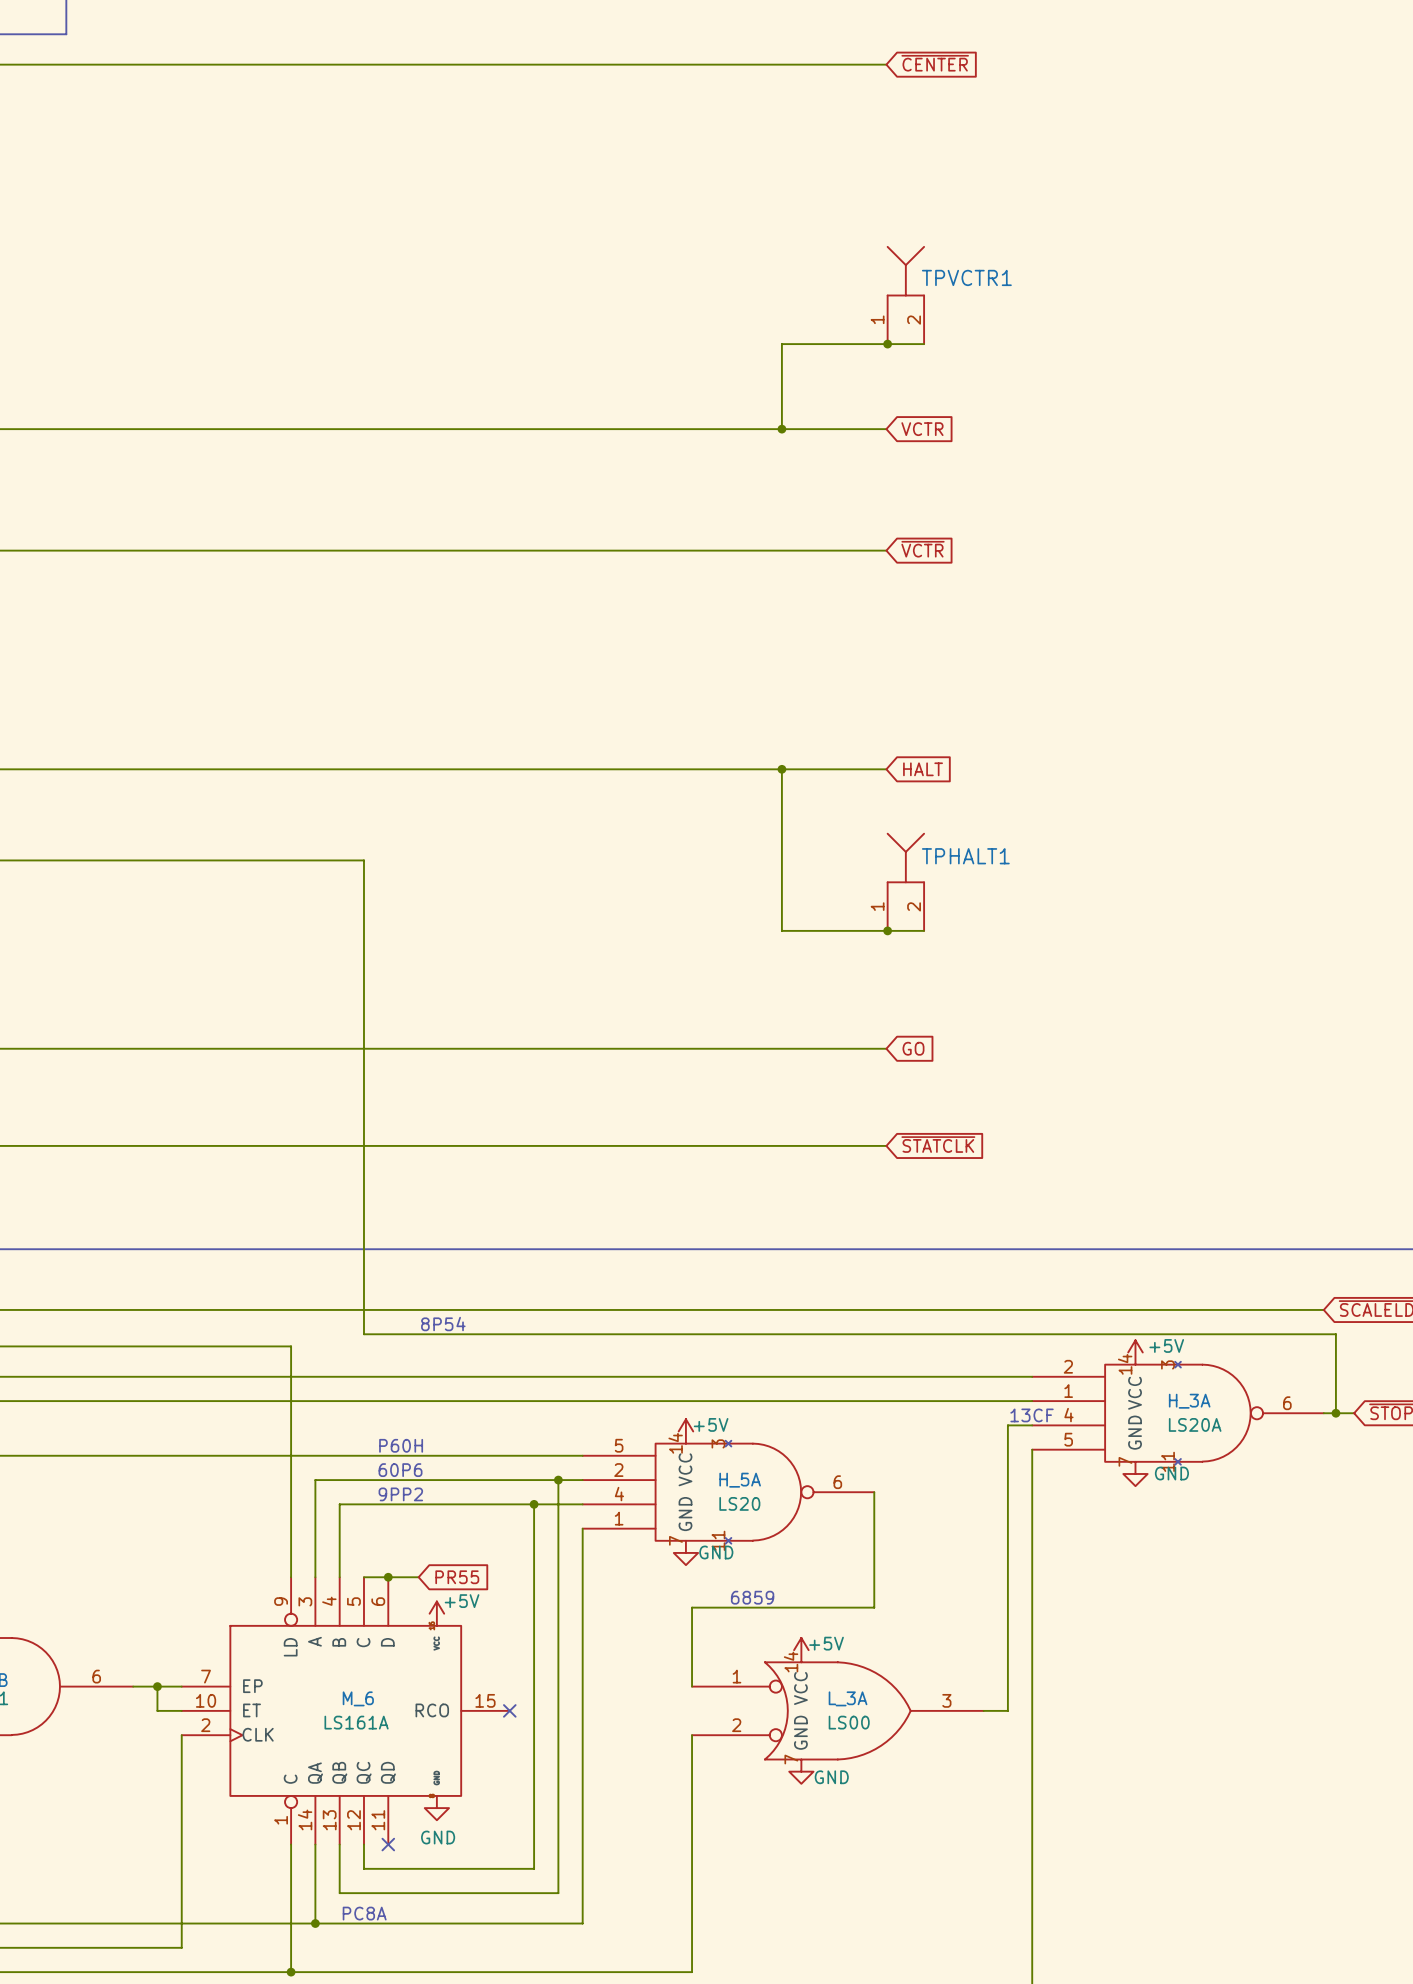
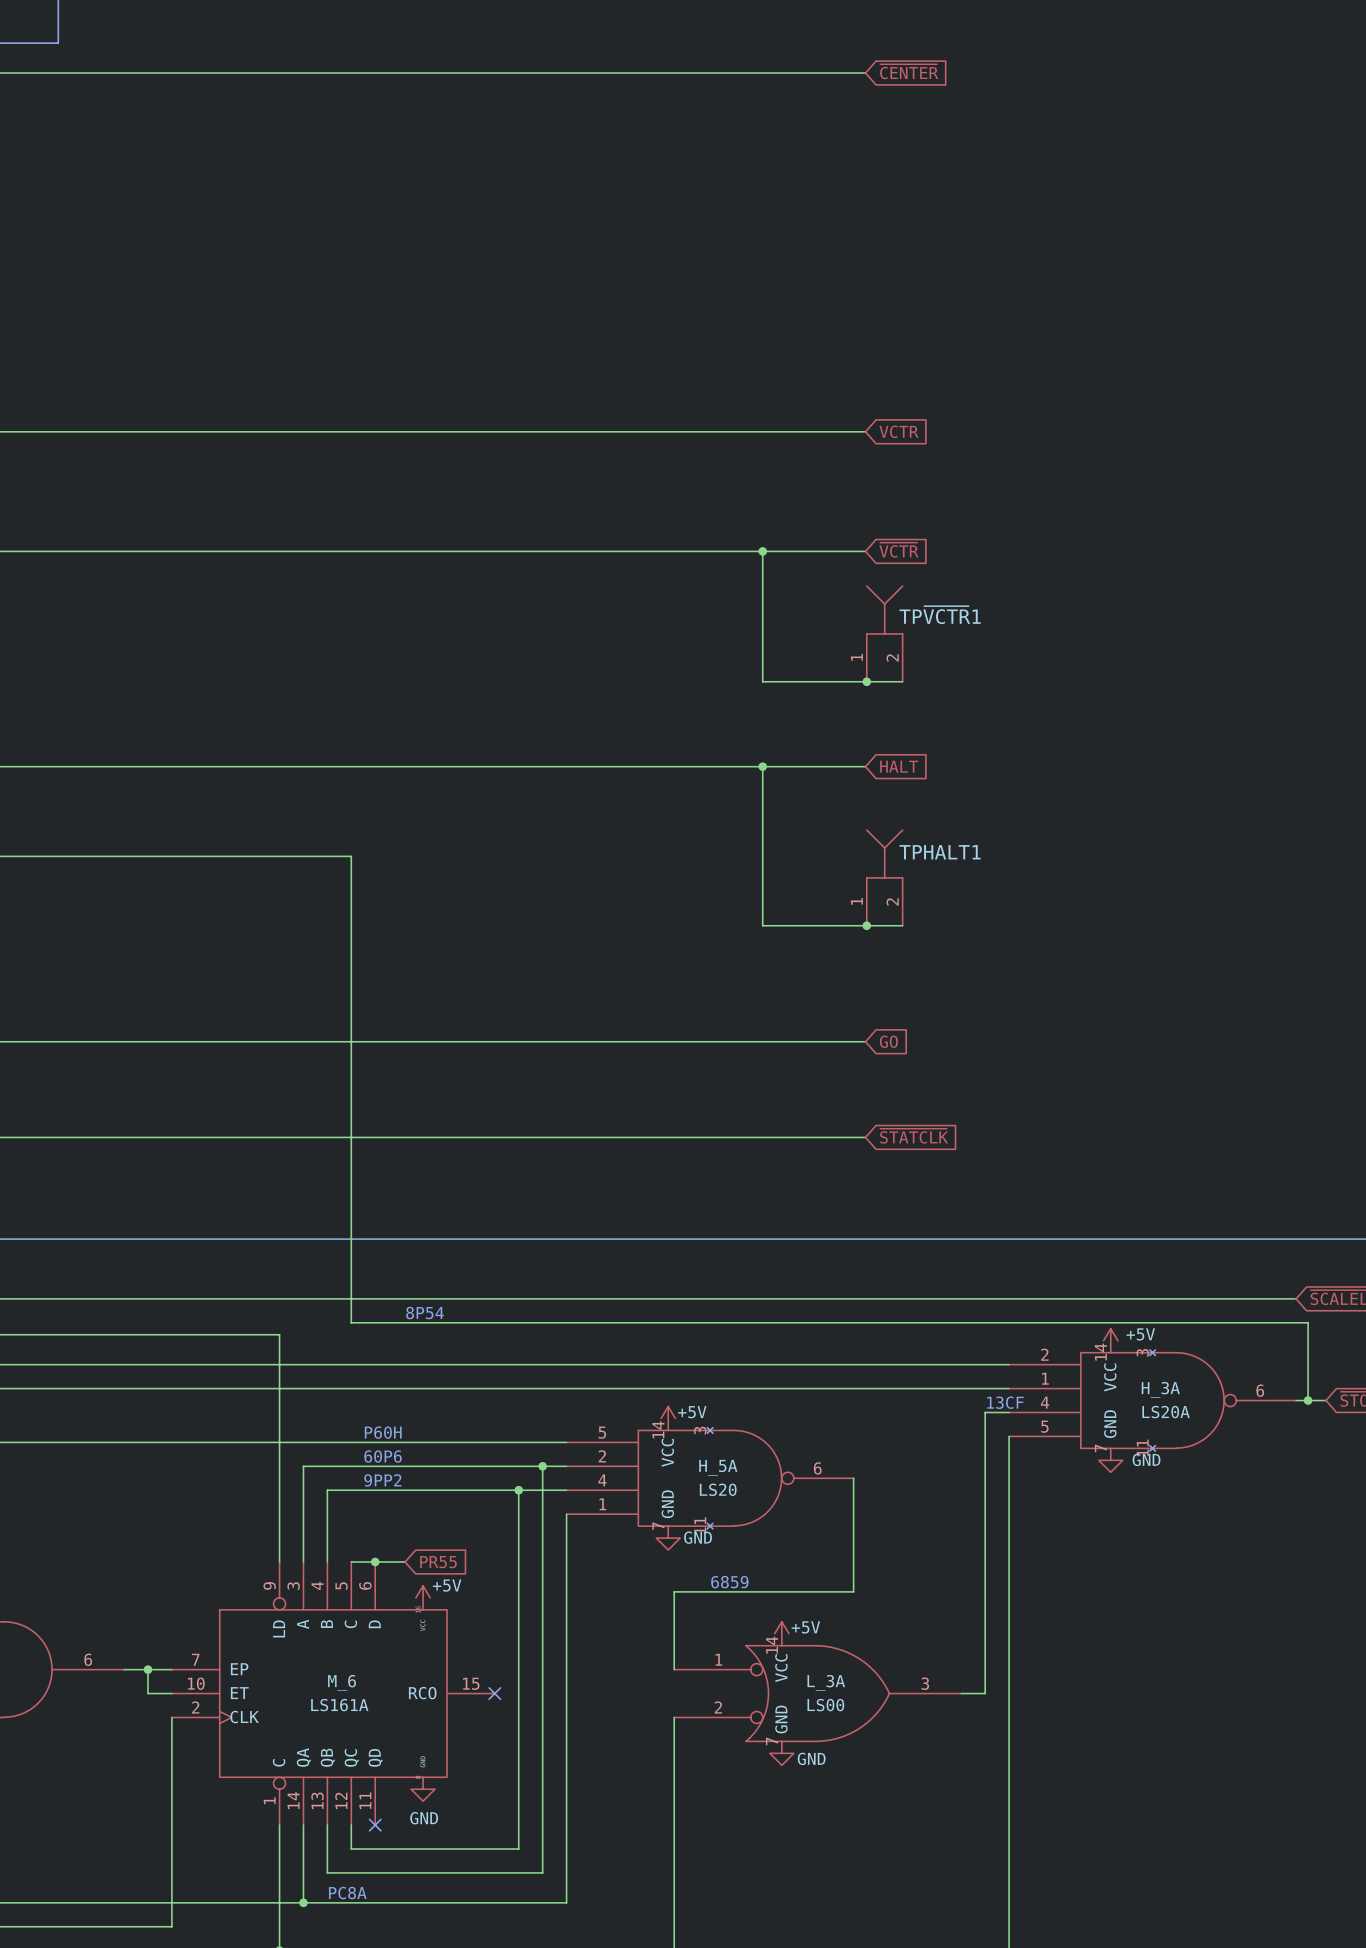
TPVCTR1: (905, 295) -> none
junction: (887, 344) -> none
wire: (924, 344) (781, 344) (781, 429) -> none
junction: (781, 429) -> none
wire: none -> (762, 551) (762, 681) (902, 681)
junction: none -> (762, 551)
TP~{VCTR}1: none -> (884, 633)
junction: none -> (866, 681)

